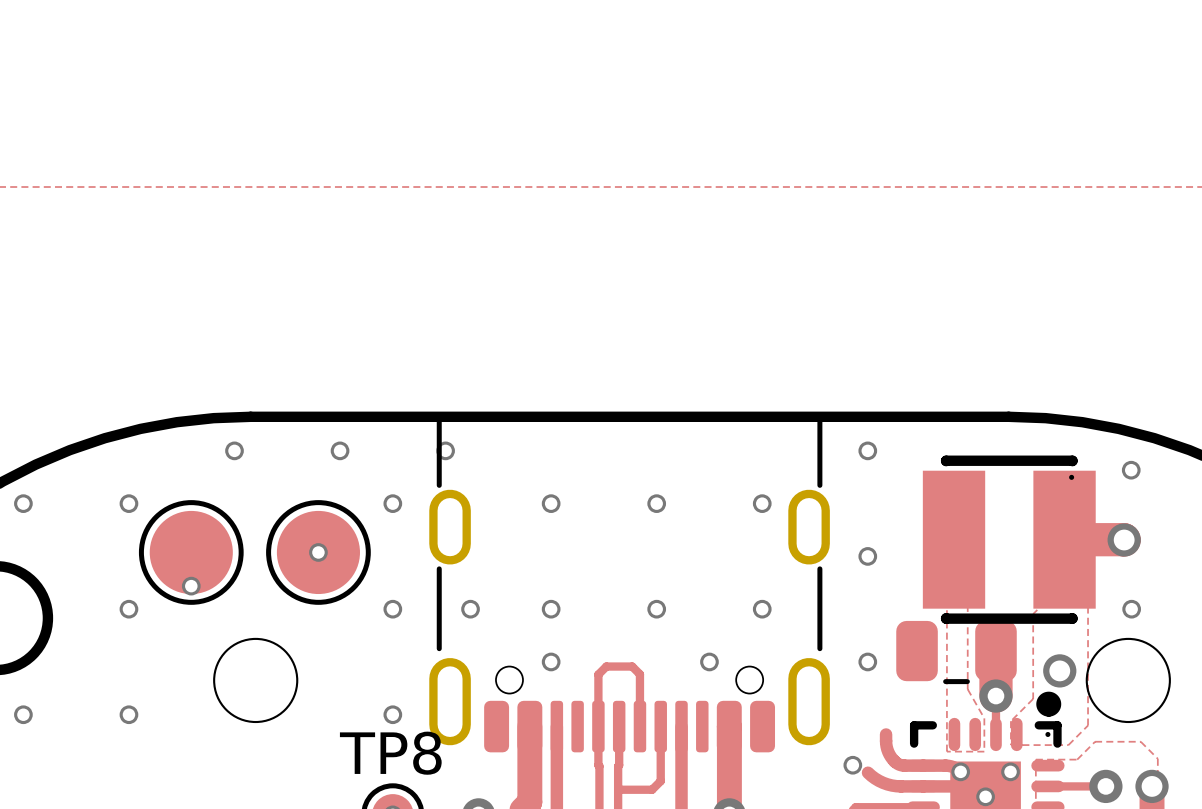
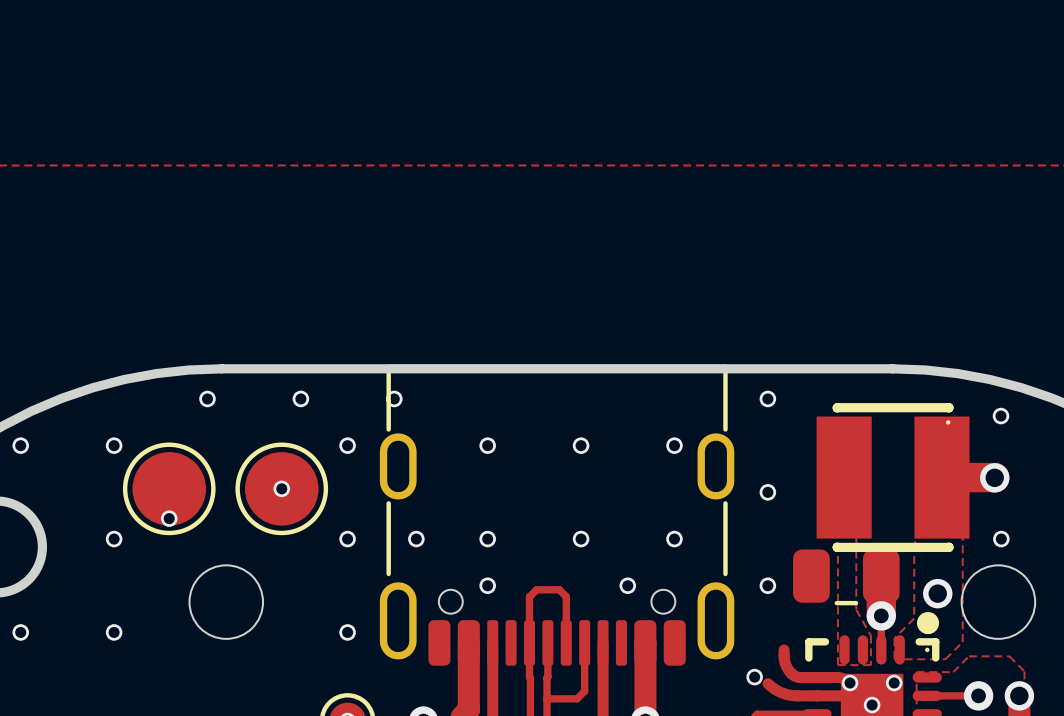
TP8 name: TP8 (390, 753) -> none

